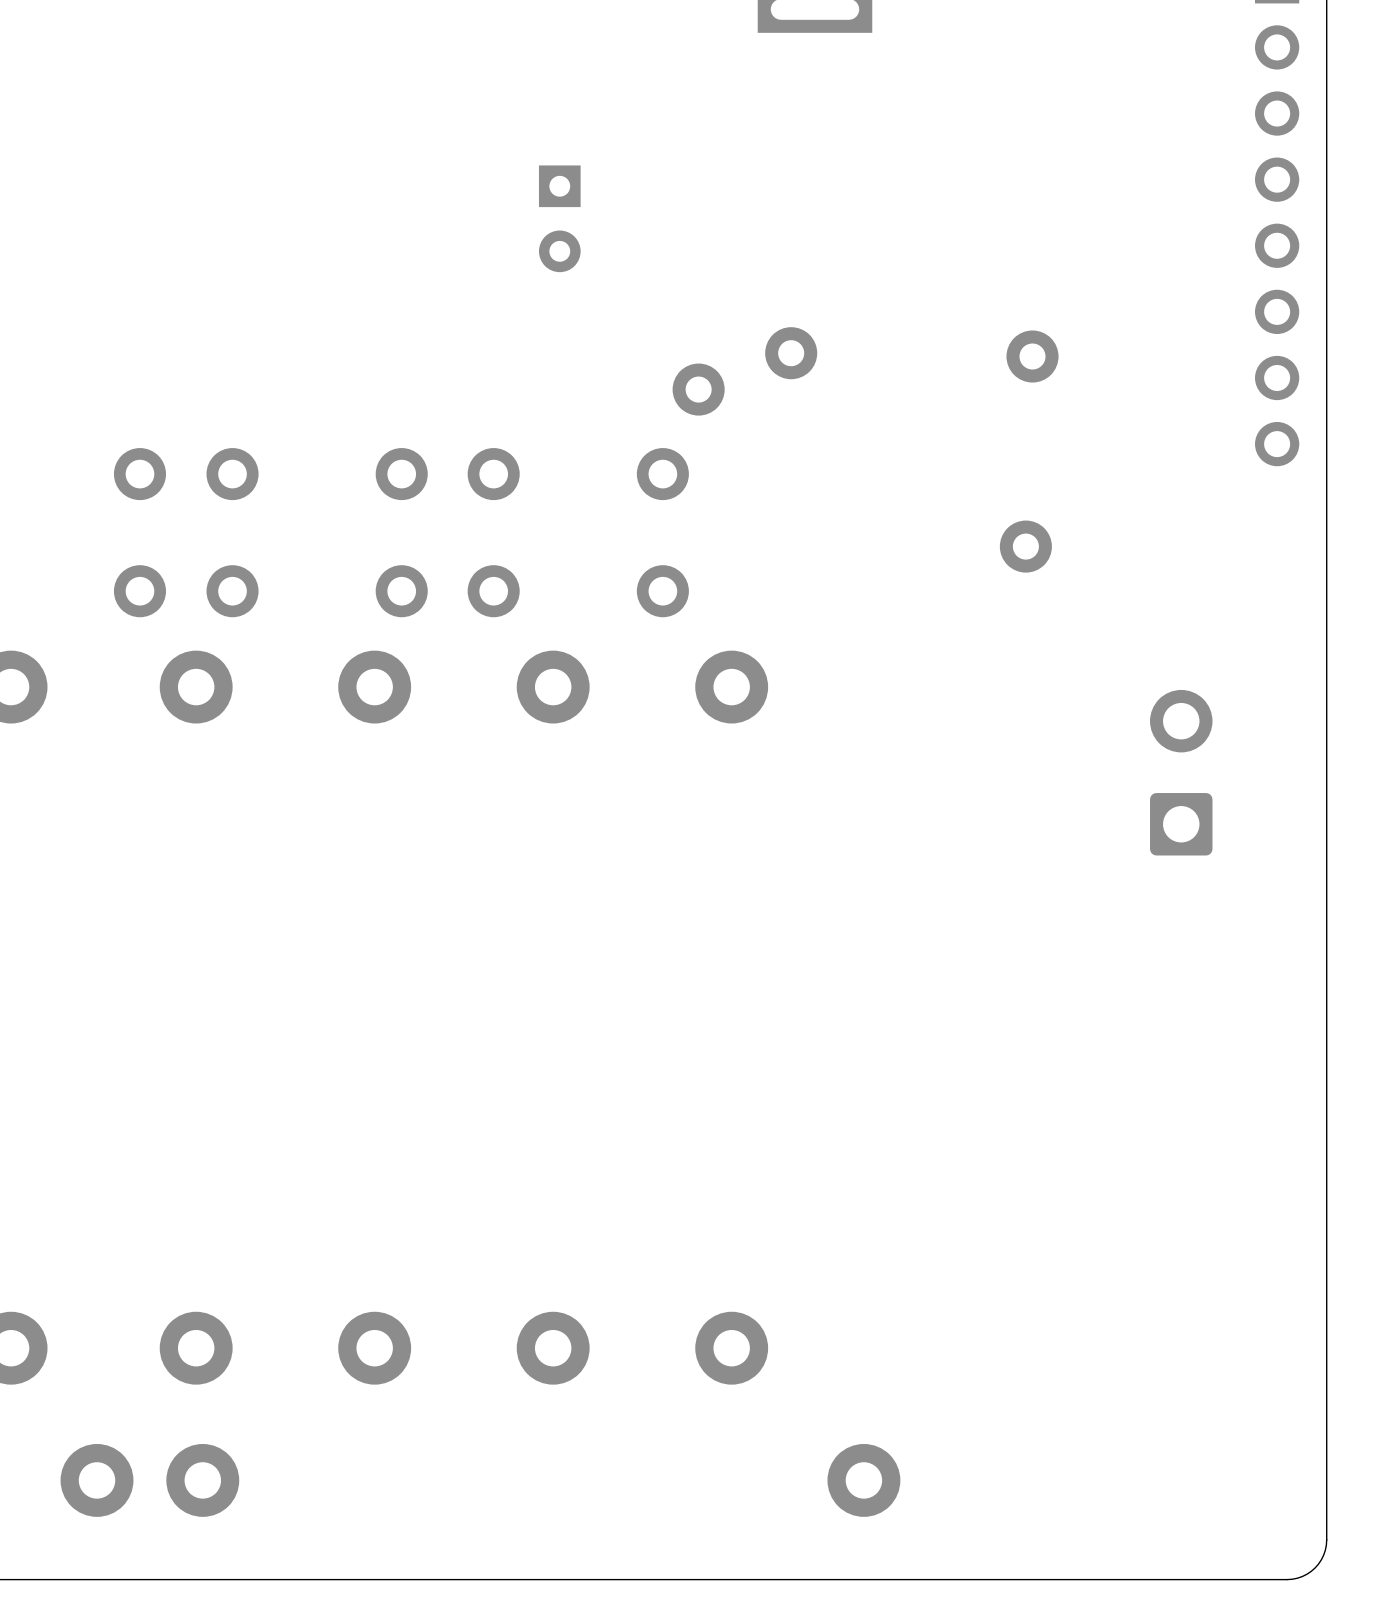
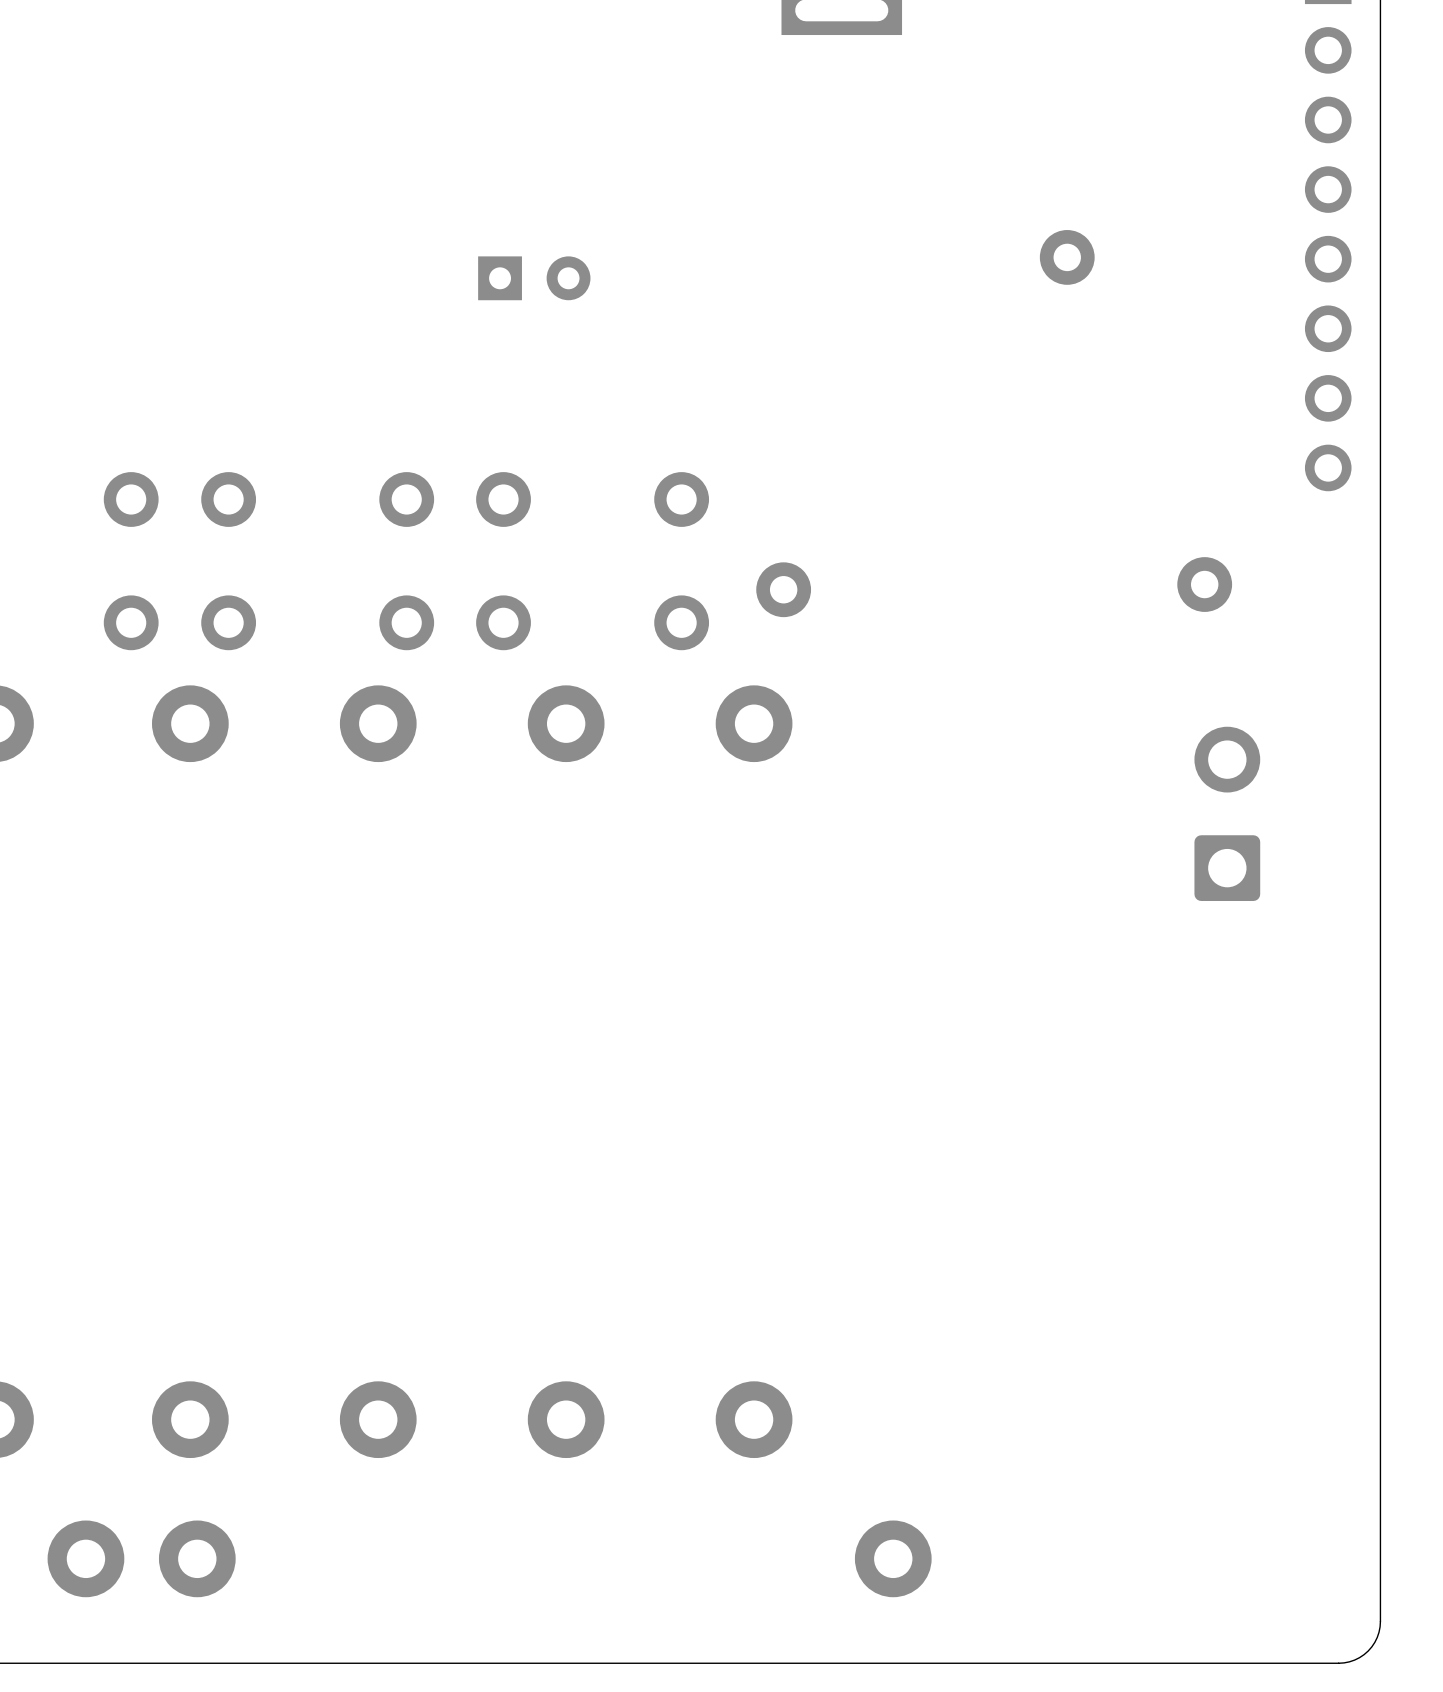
part rotation: 0° (559, 218) -> 90° counterclockwise (534, 278)
part: (791, 353) -> none
part position: (1032, 356) -> (1067, 257)
part: (698, 389) -> none
part: (1025, 546) -> none
part: none -> (1204, 584)
part: none -> (783, 589)

